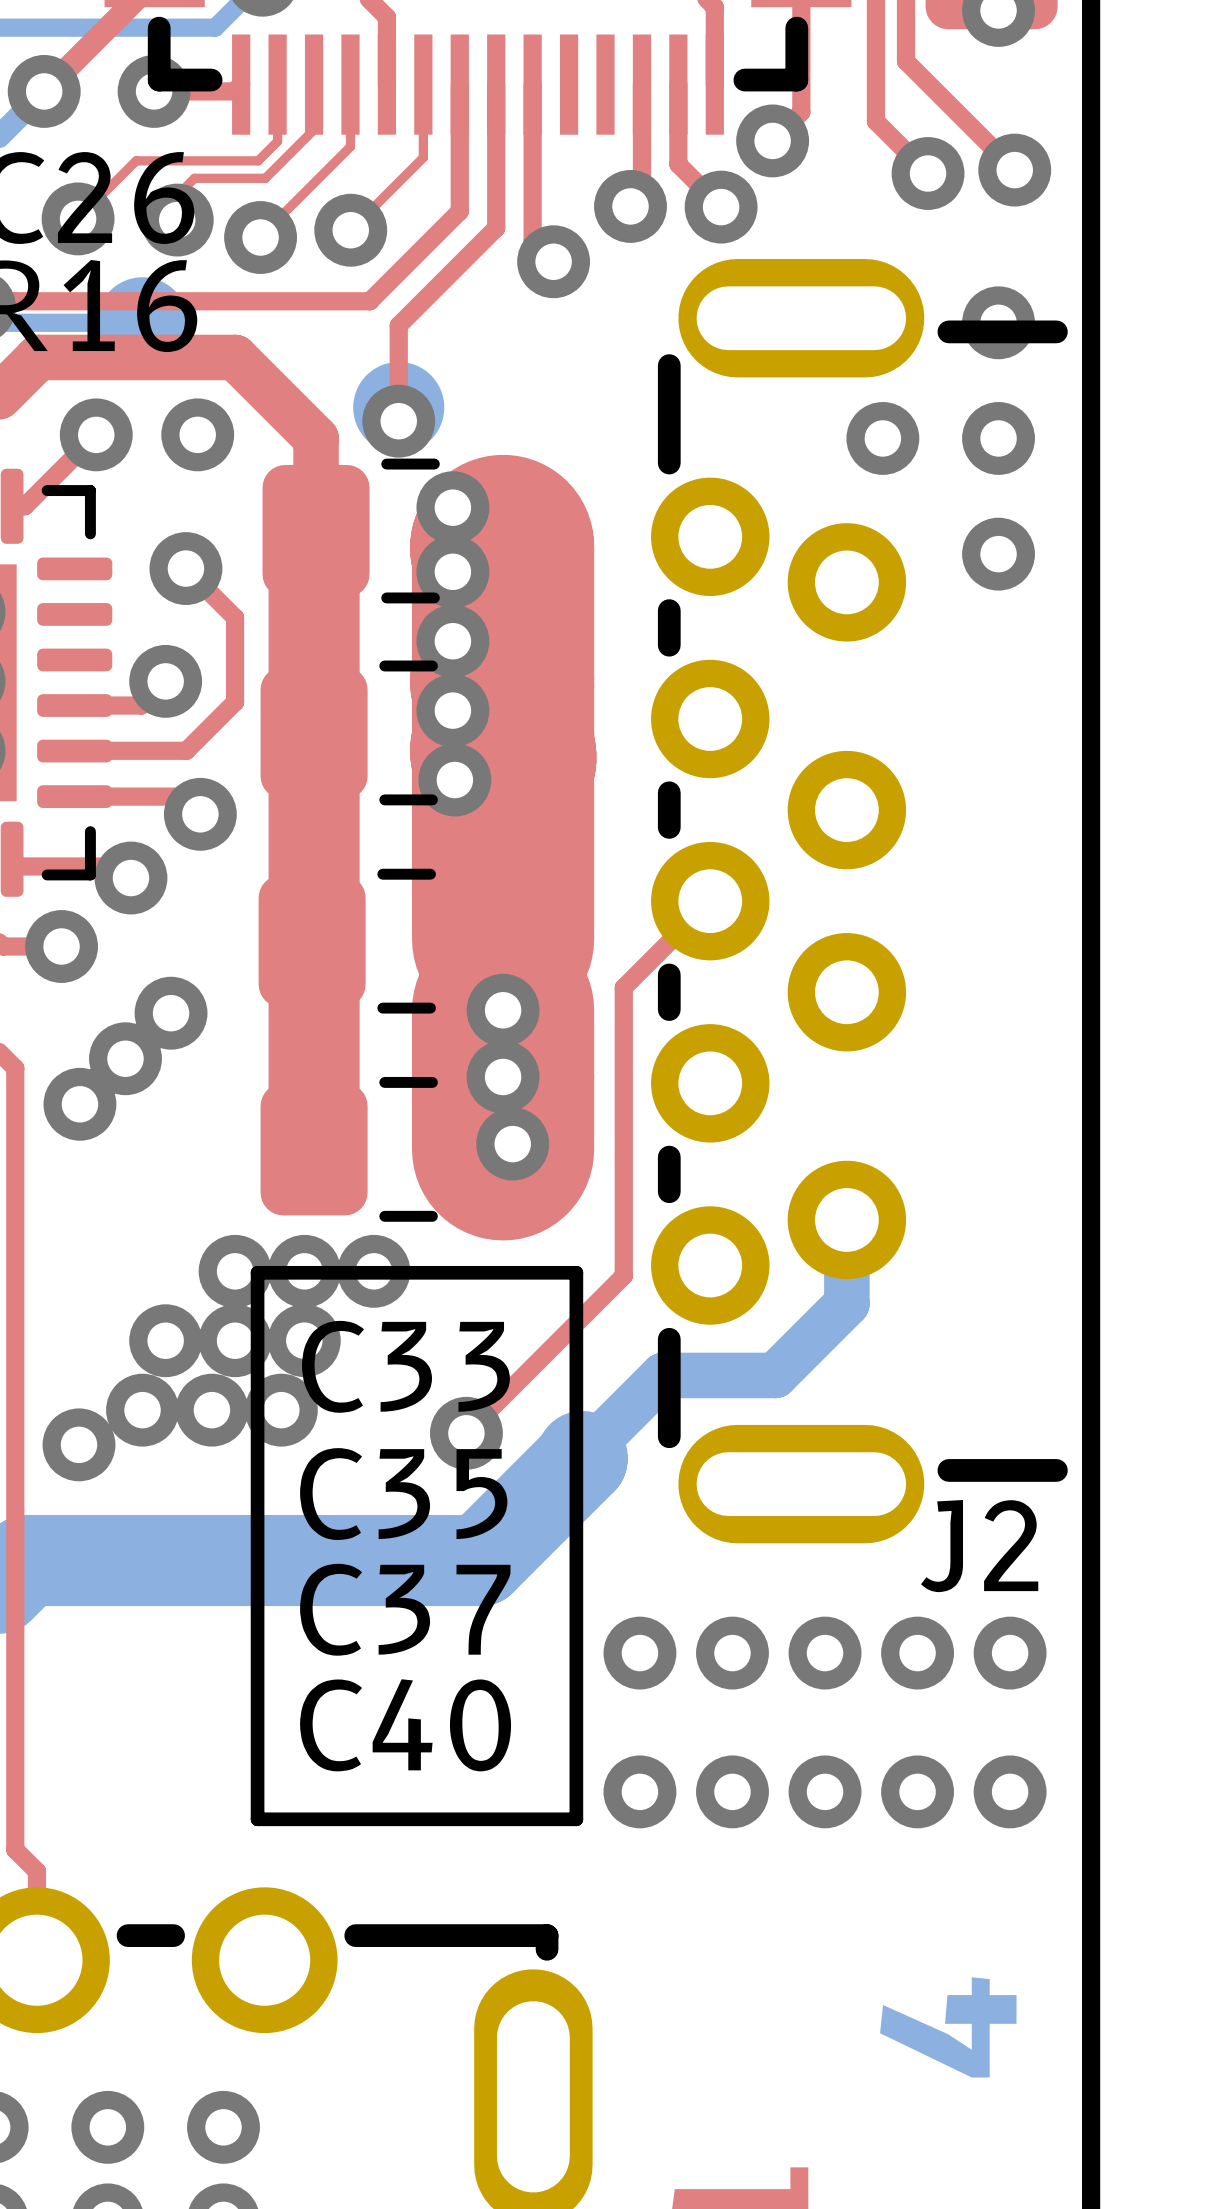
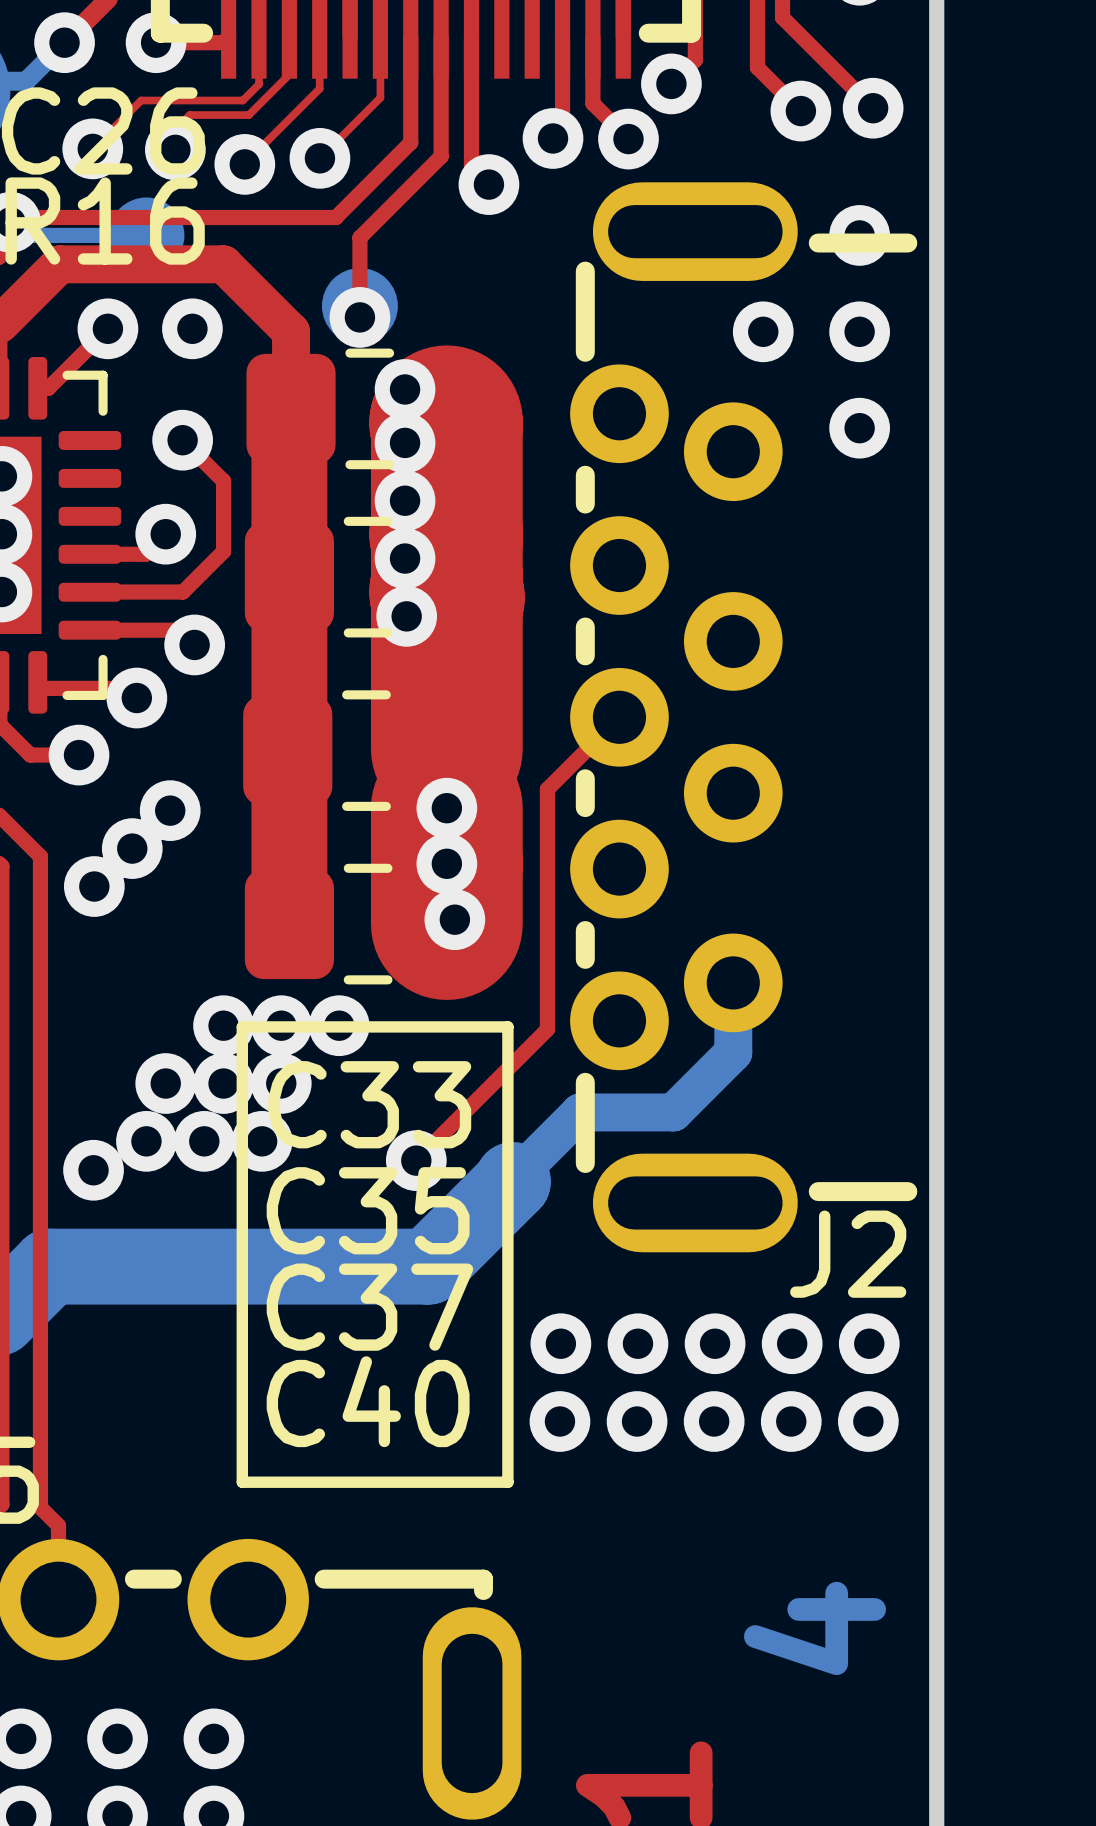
via position: (639, 1791) -> (559, 1421)
via position: (732, 1791) -> (637, 1421)
via position: (825, 1791) -> (714, 1421)
via position: (917, 1791) -> (791, 1421)
via position: (1010, 1791) -> (868, 1421)

